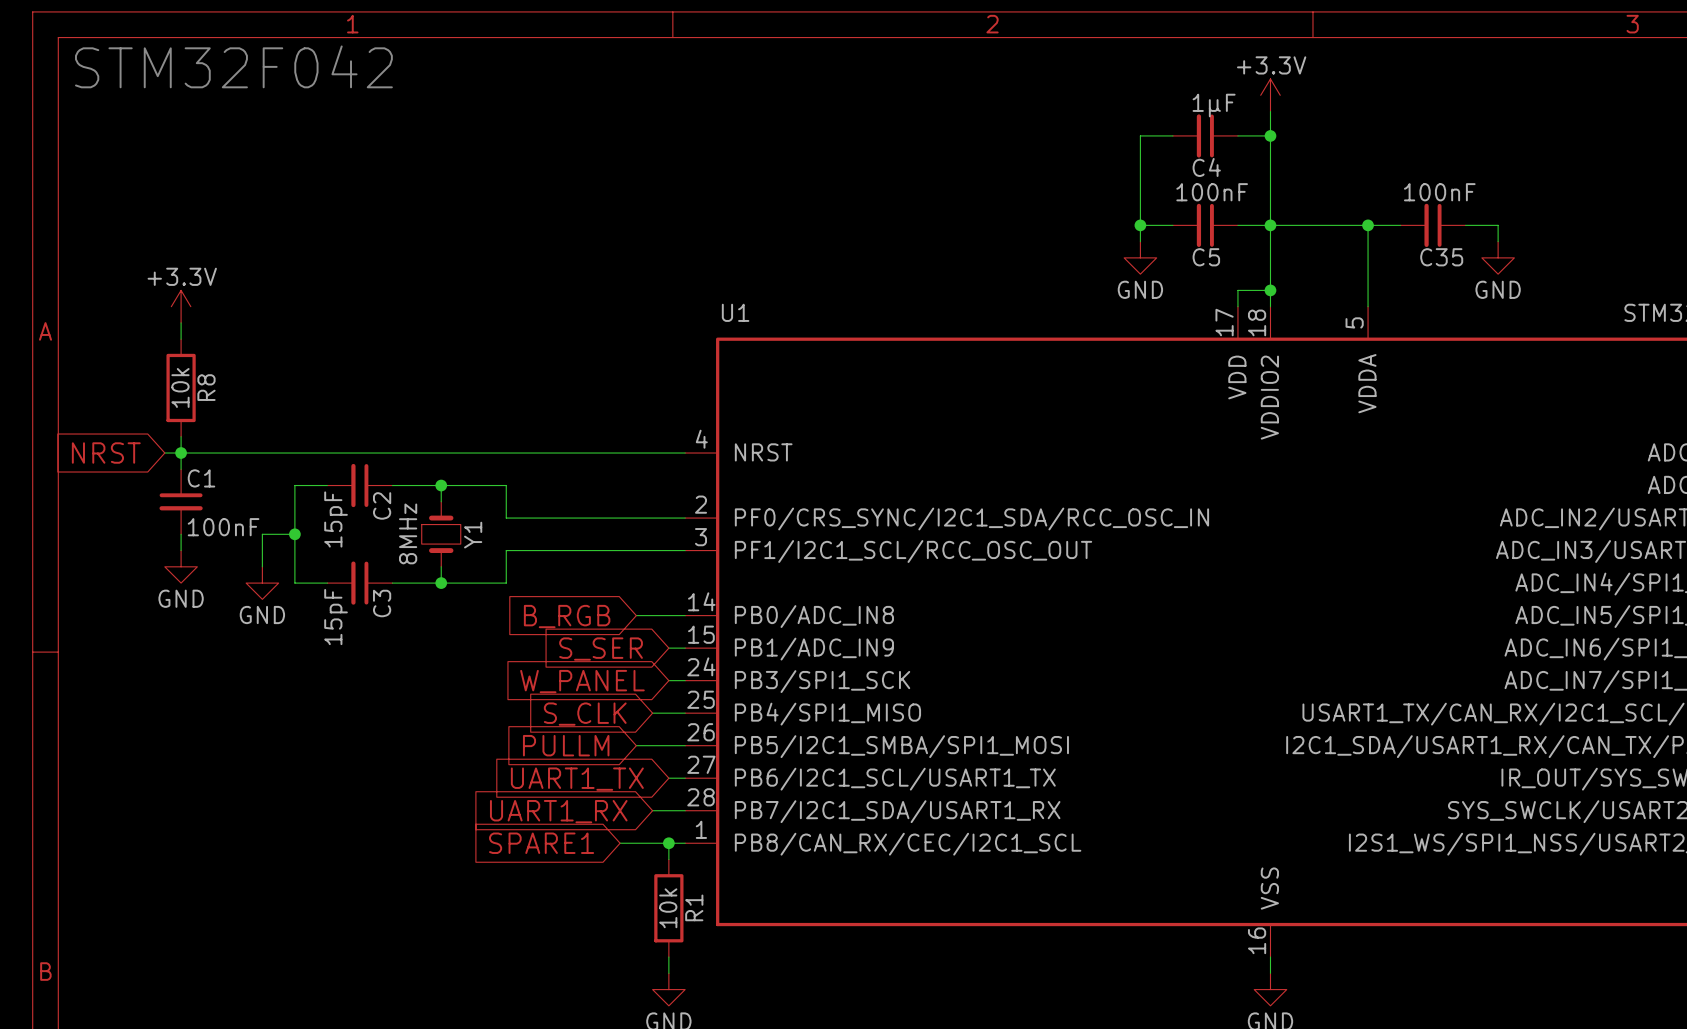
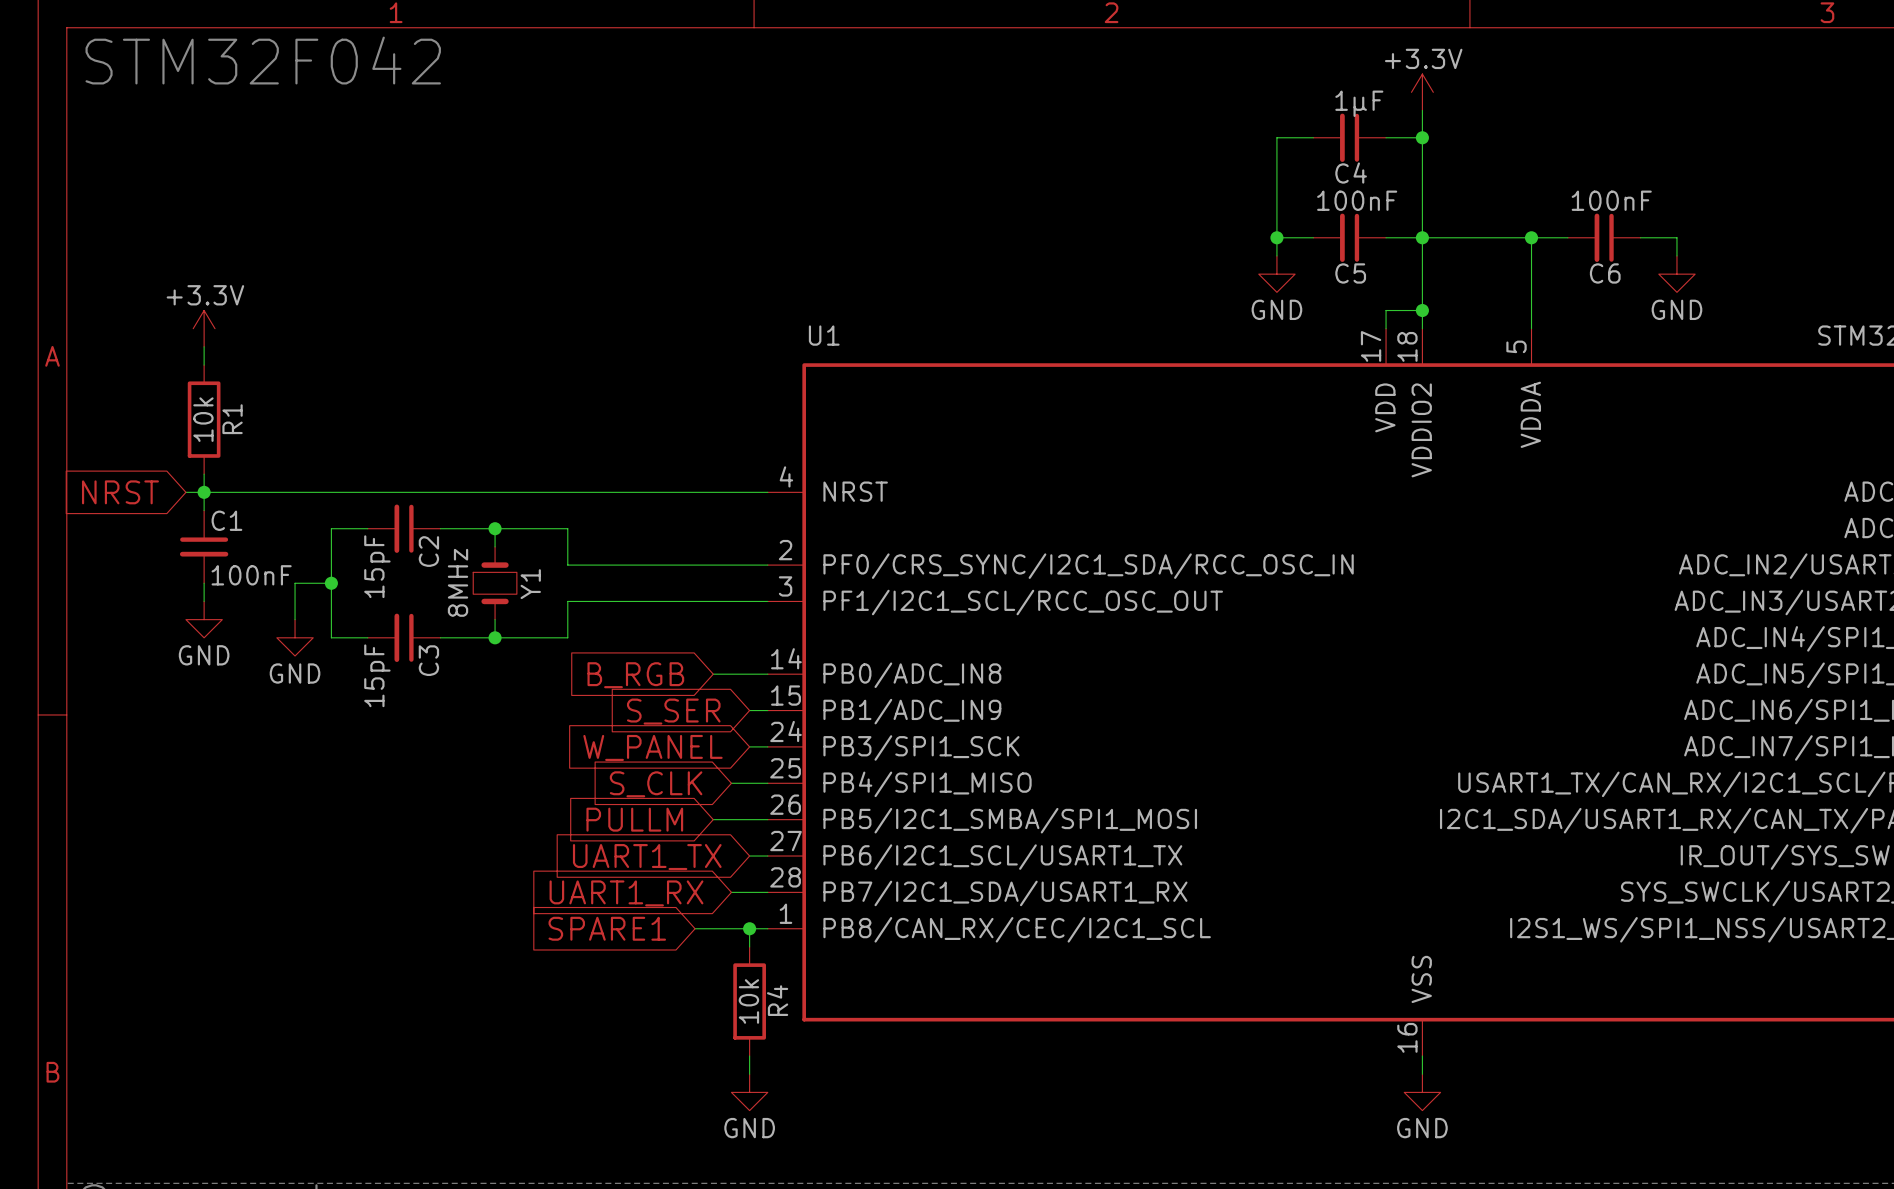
C35 name: C35 (1441, 257) -> C6 (1605, 273)
R8 name: R8 (206, 387) -> R1 (232, 419)
R1 name: R1 (694, 907) -> R4 (777, 1000)

